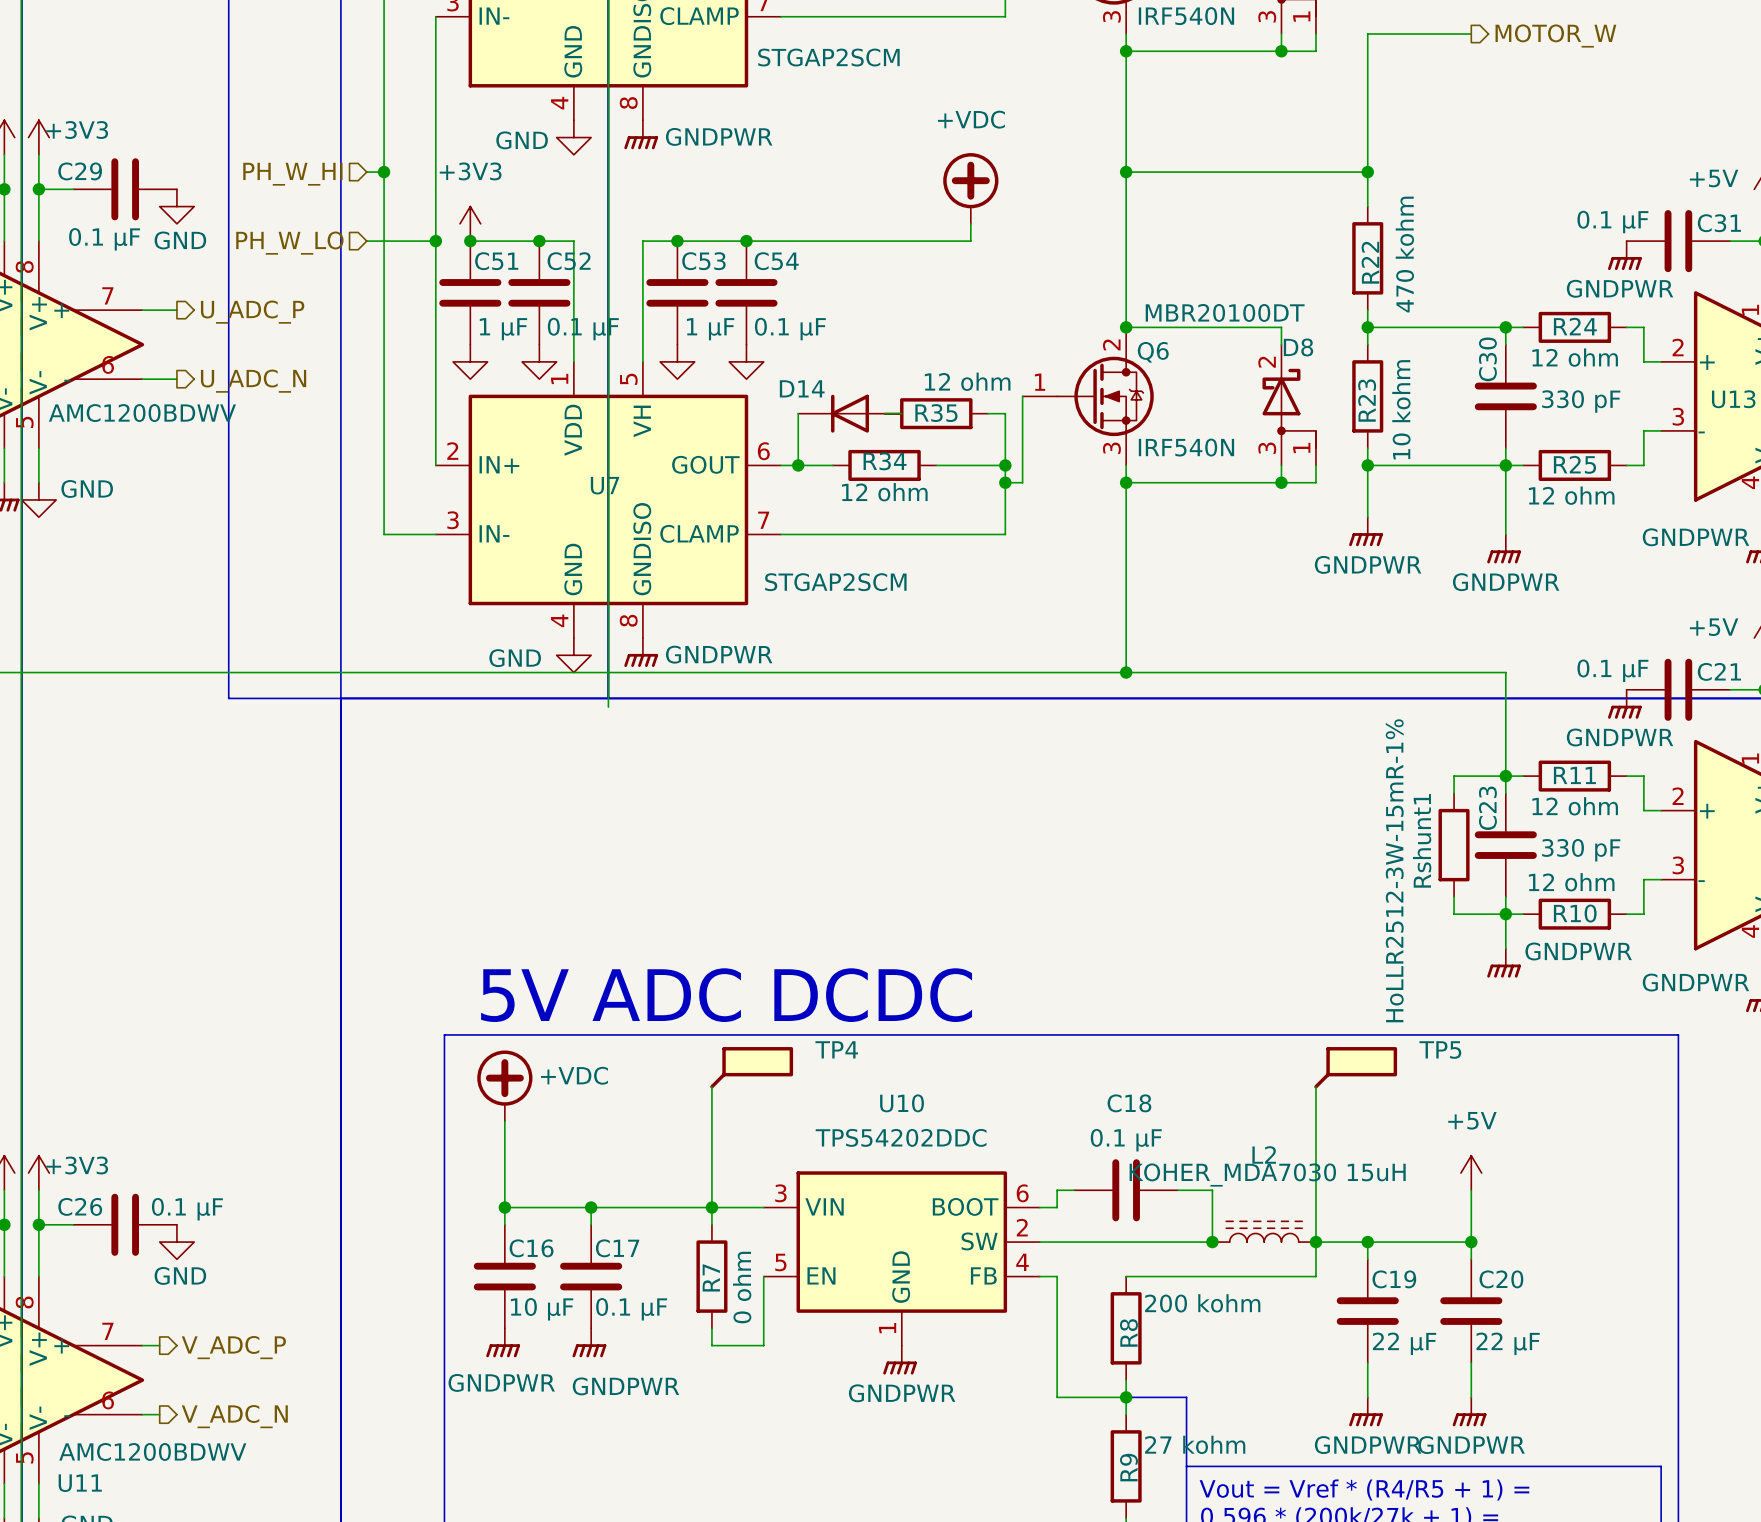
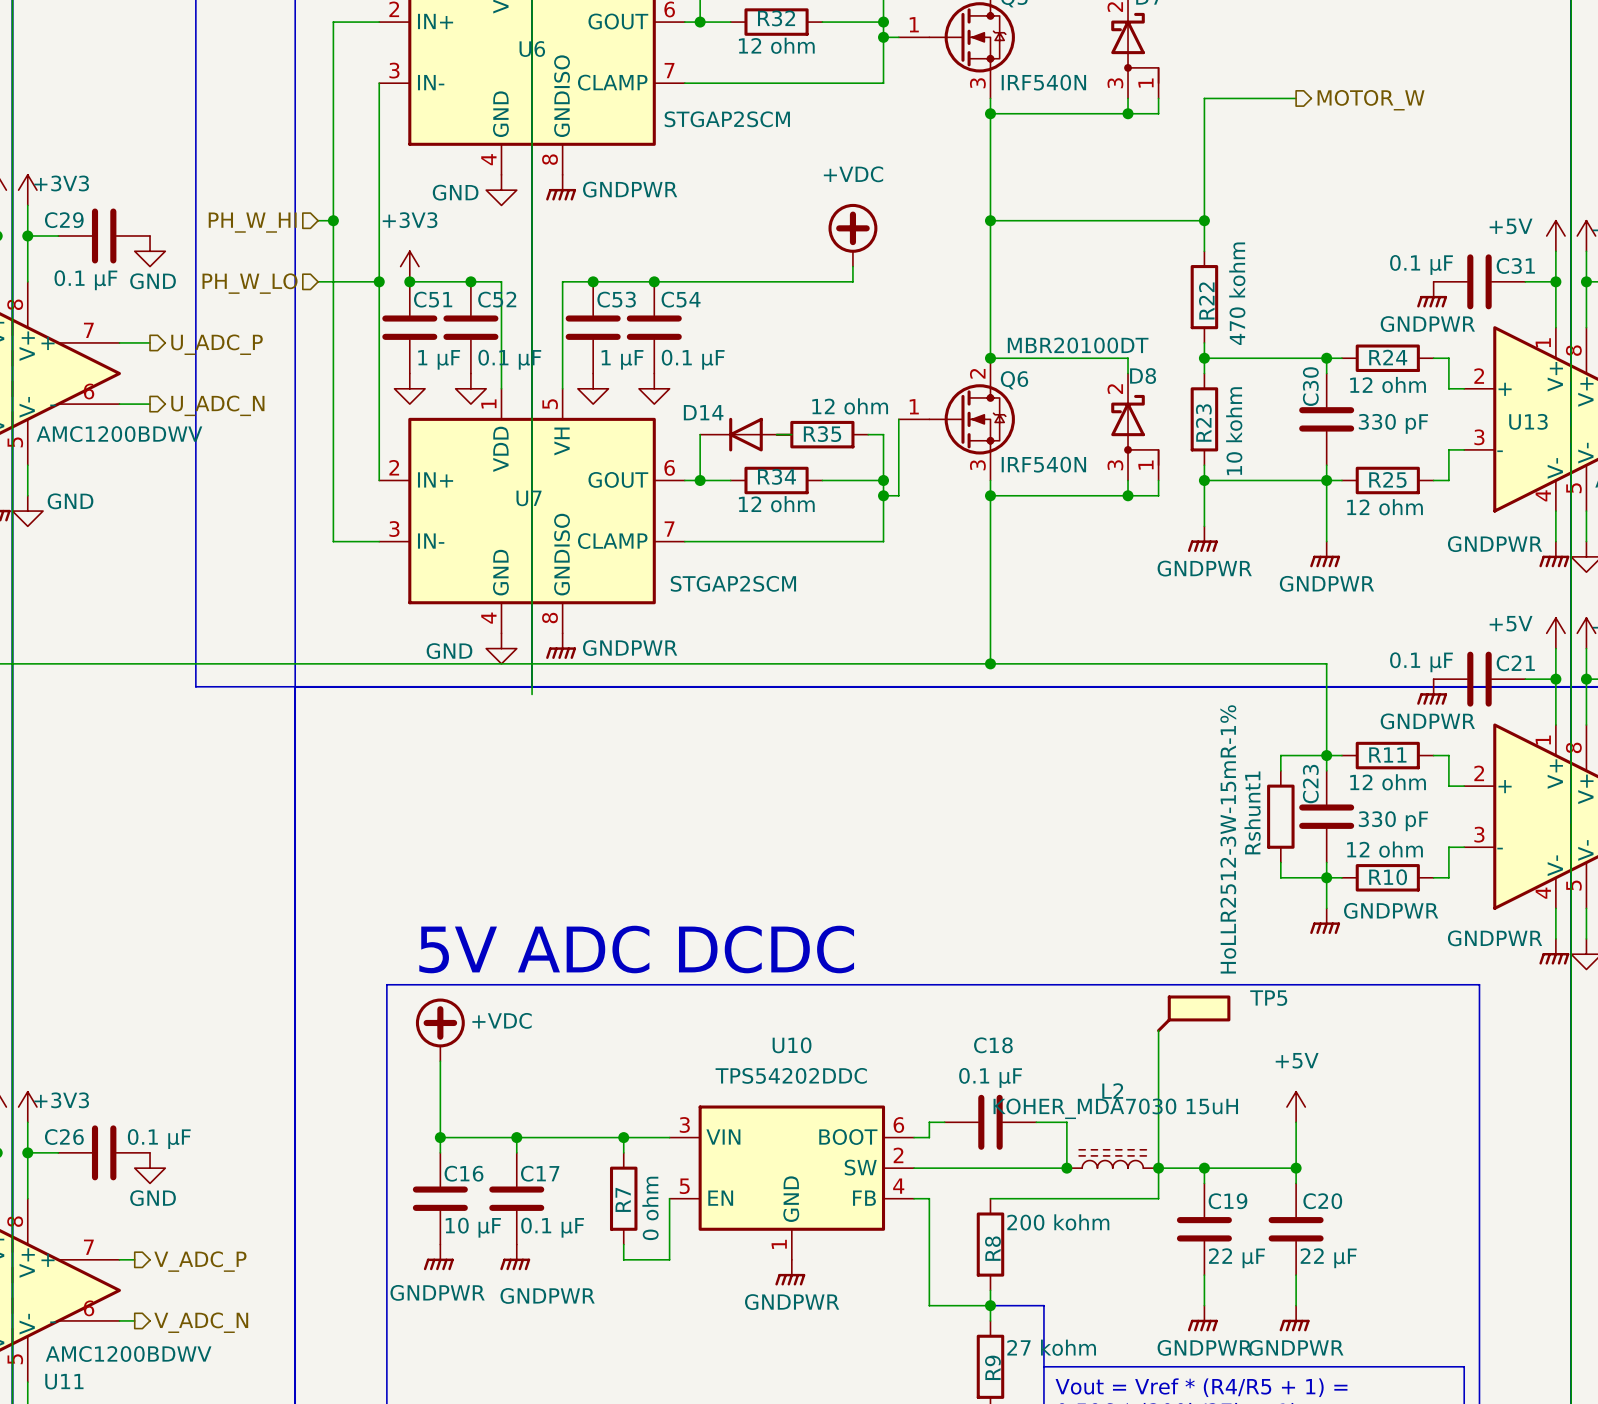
TP4: (751, 1067) -> none
wire: (711, 1086) (711, 1207) -> none

